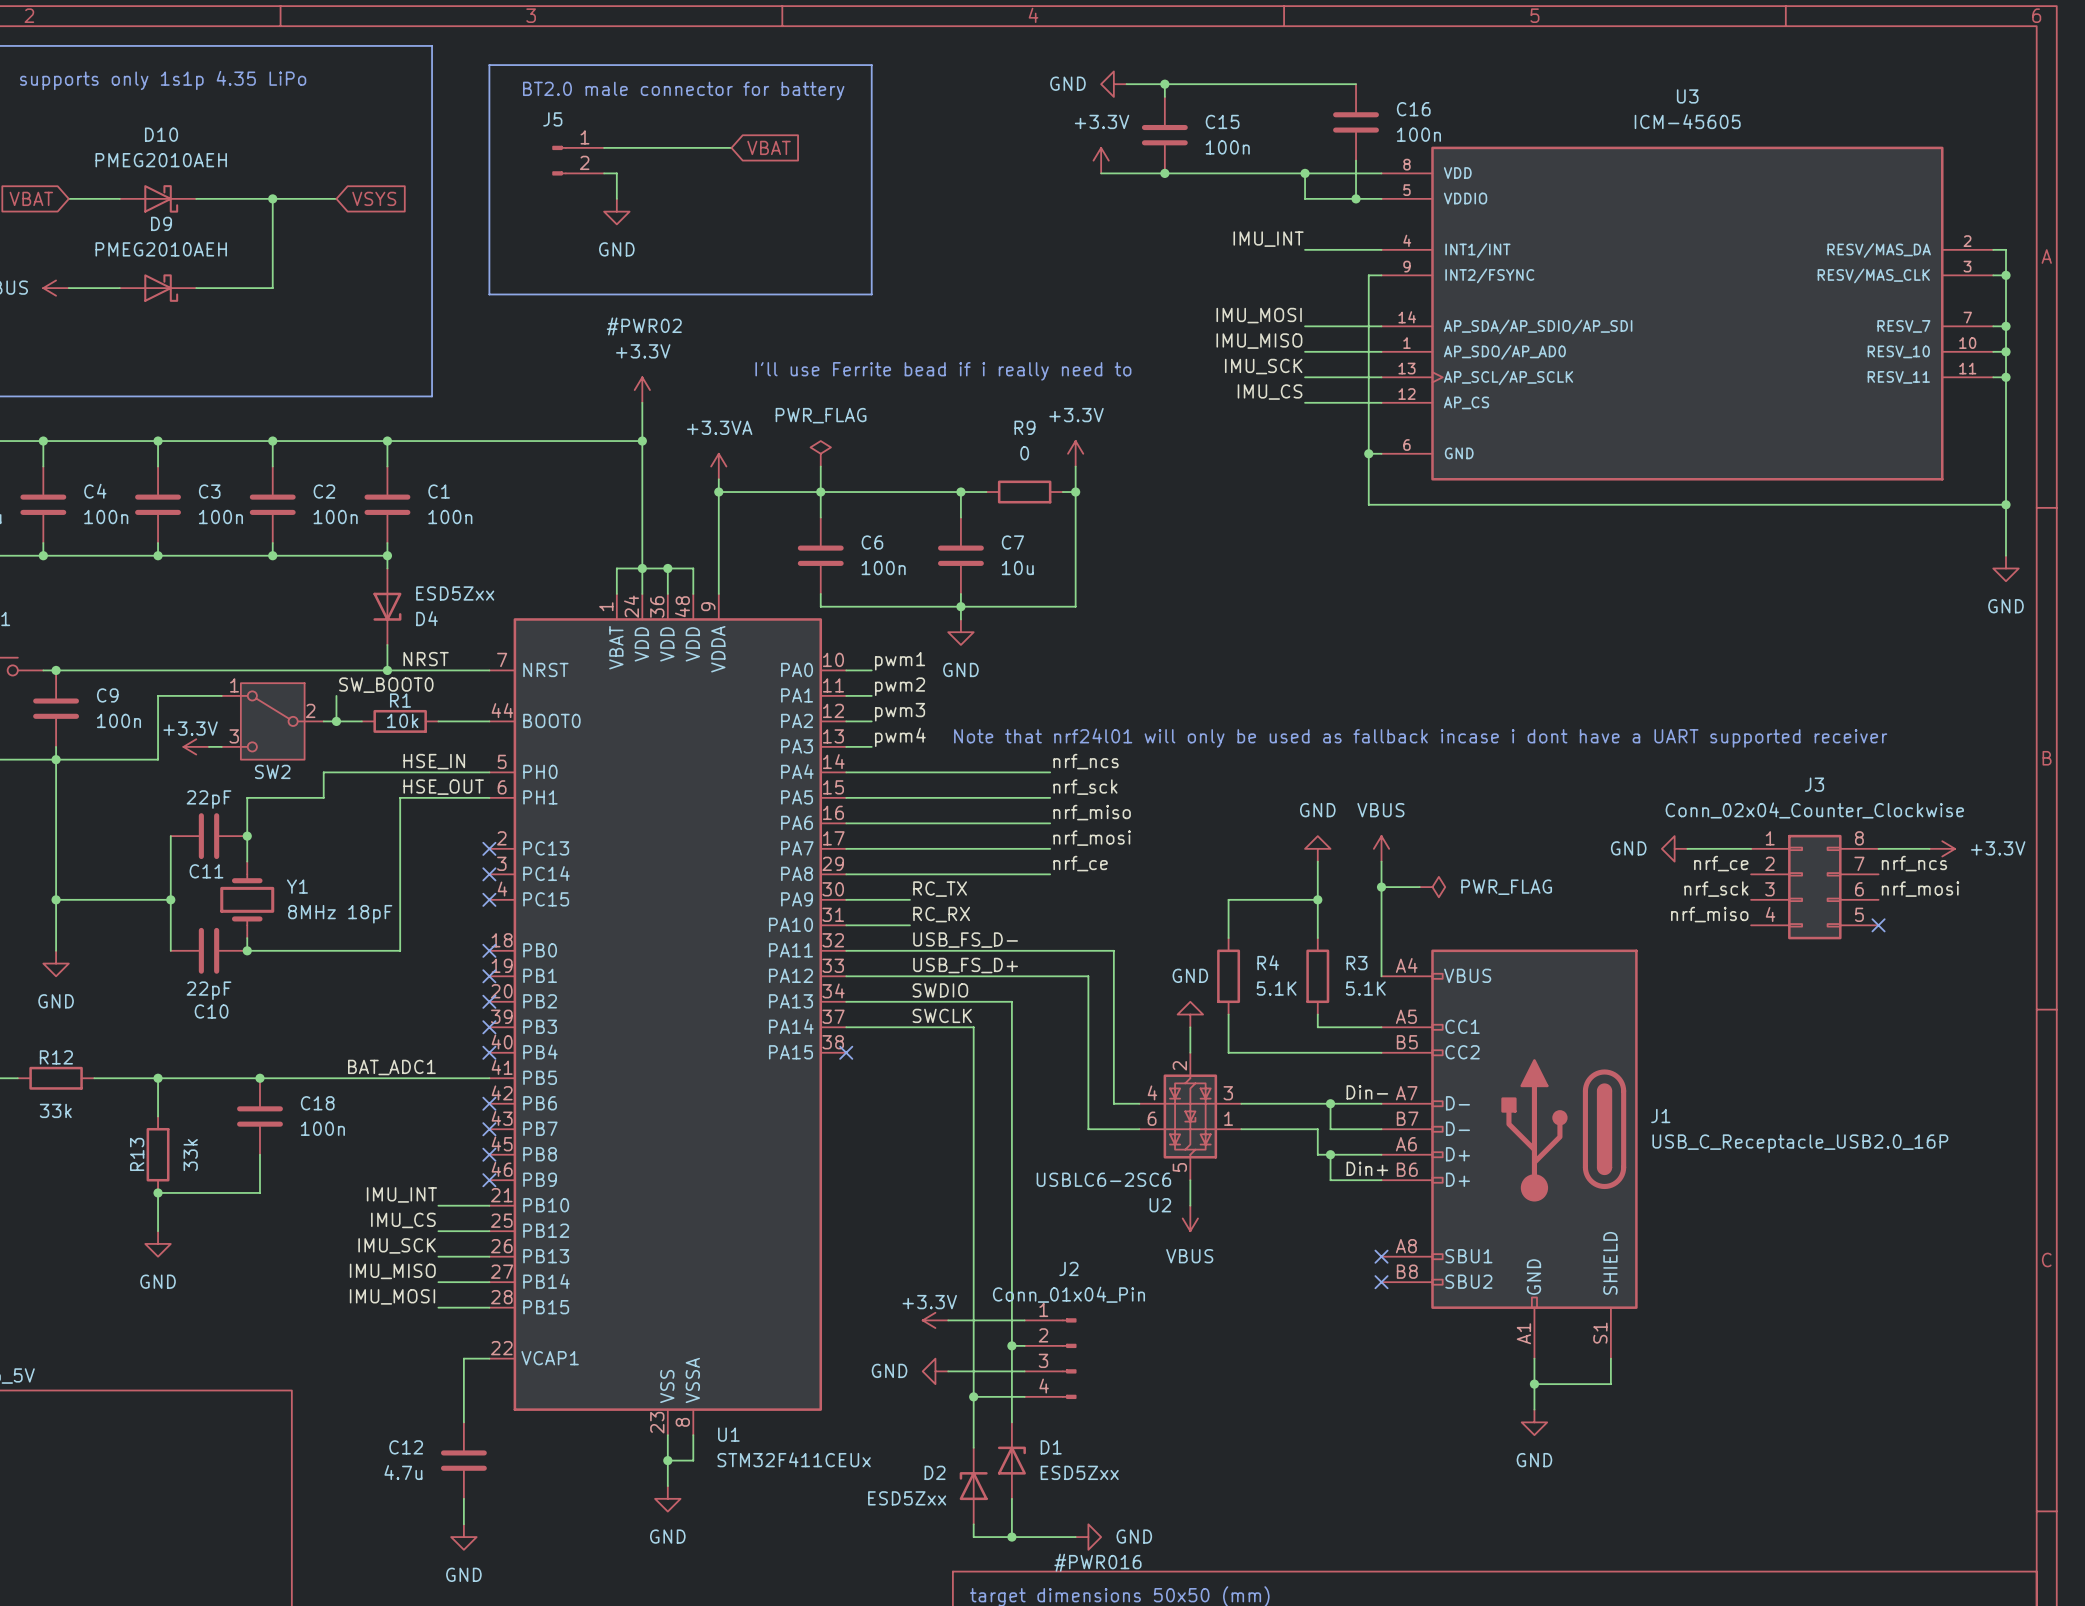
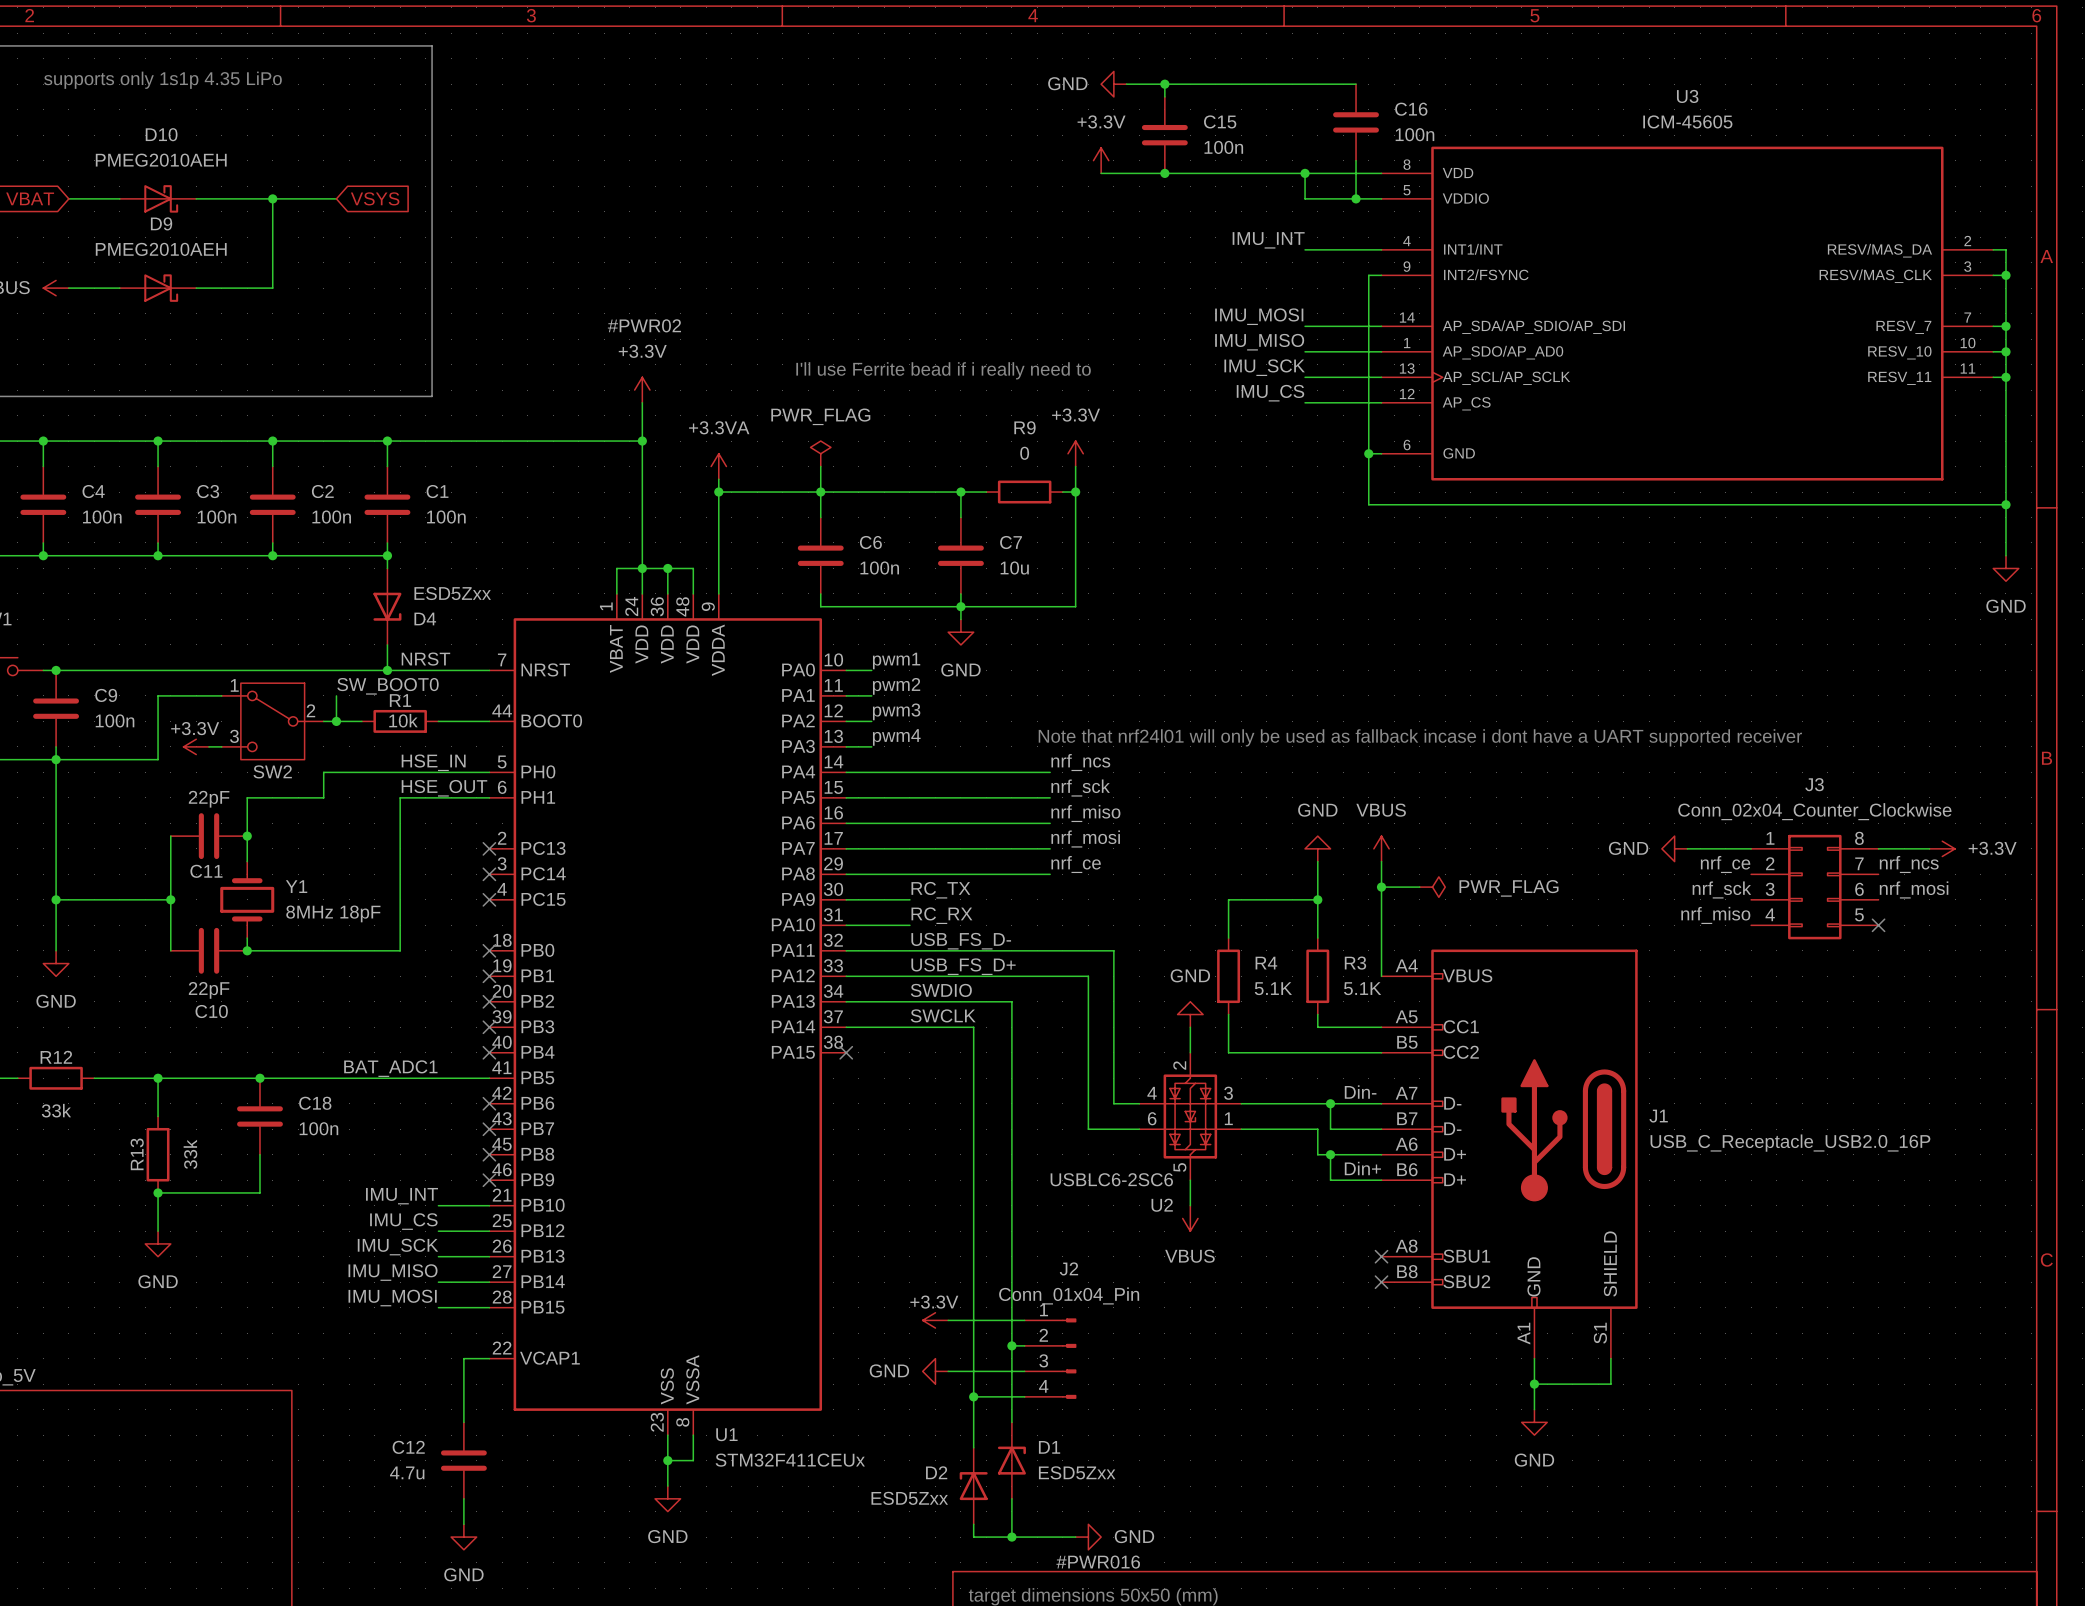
line: (489, 65) (871, 65) (871, 294) (489, 294) (489, 65) -> none
text: BT2.0 male connector for battery (683, 90) -> none
wire: (604, 147) (731, 147) -> none
global label: VBAT (769, 147) -> none
J5: (578, 160) -> none
wire: (604, 173) (616, 173) (616, 198) -> none
power symbol: GND (616, 211) -> none

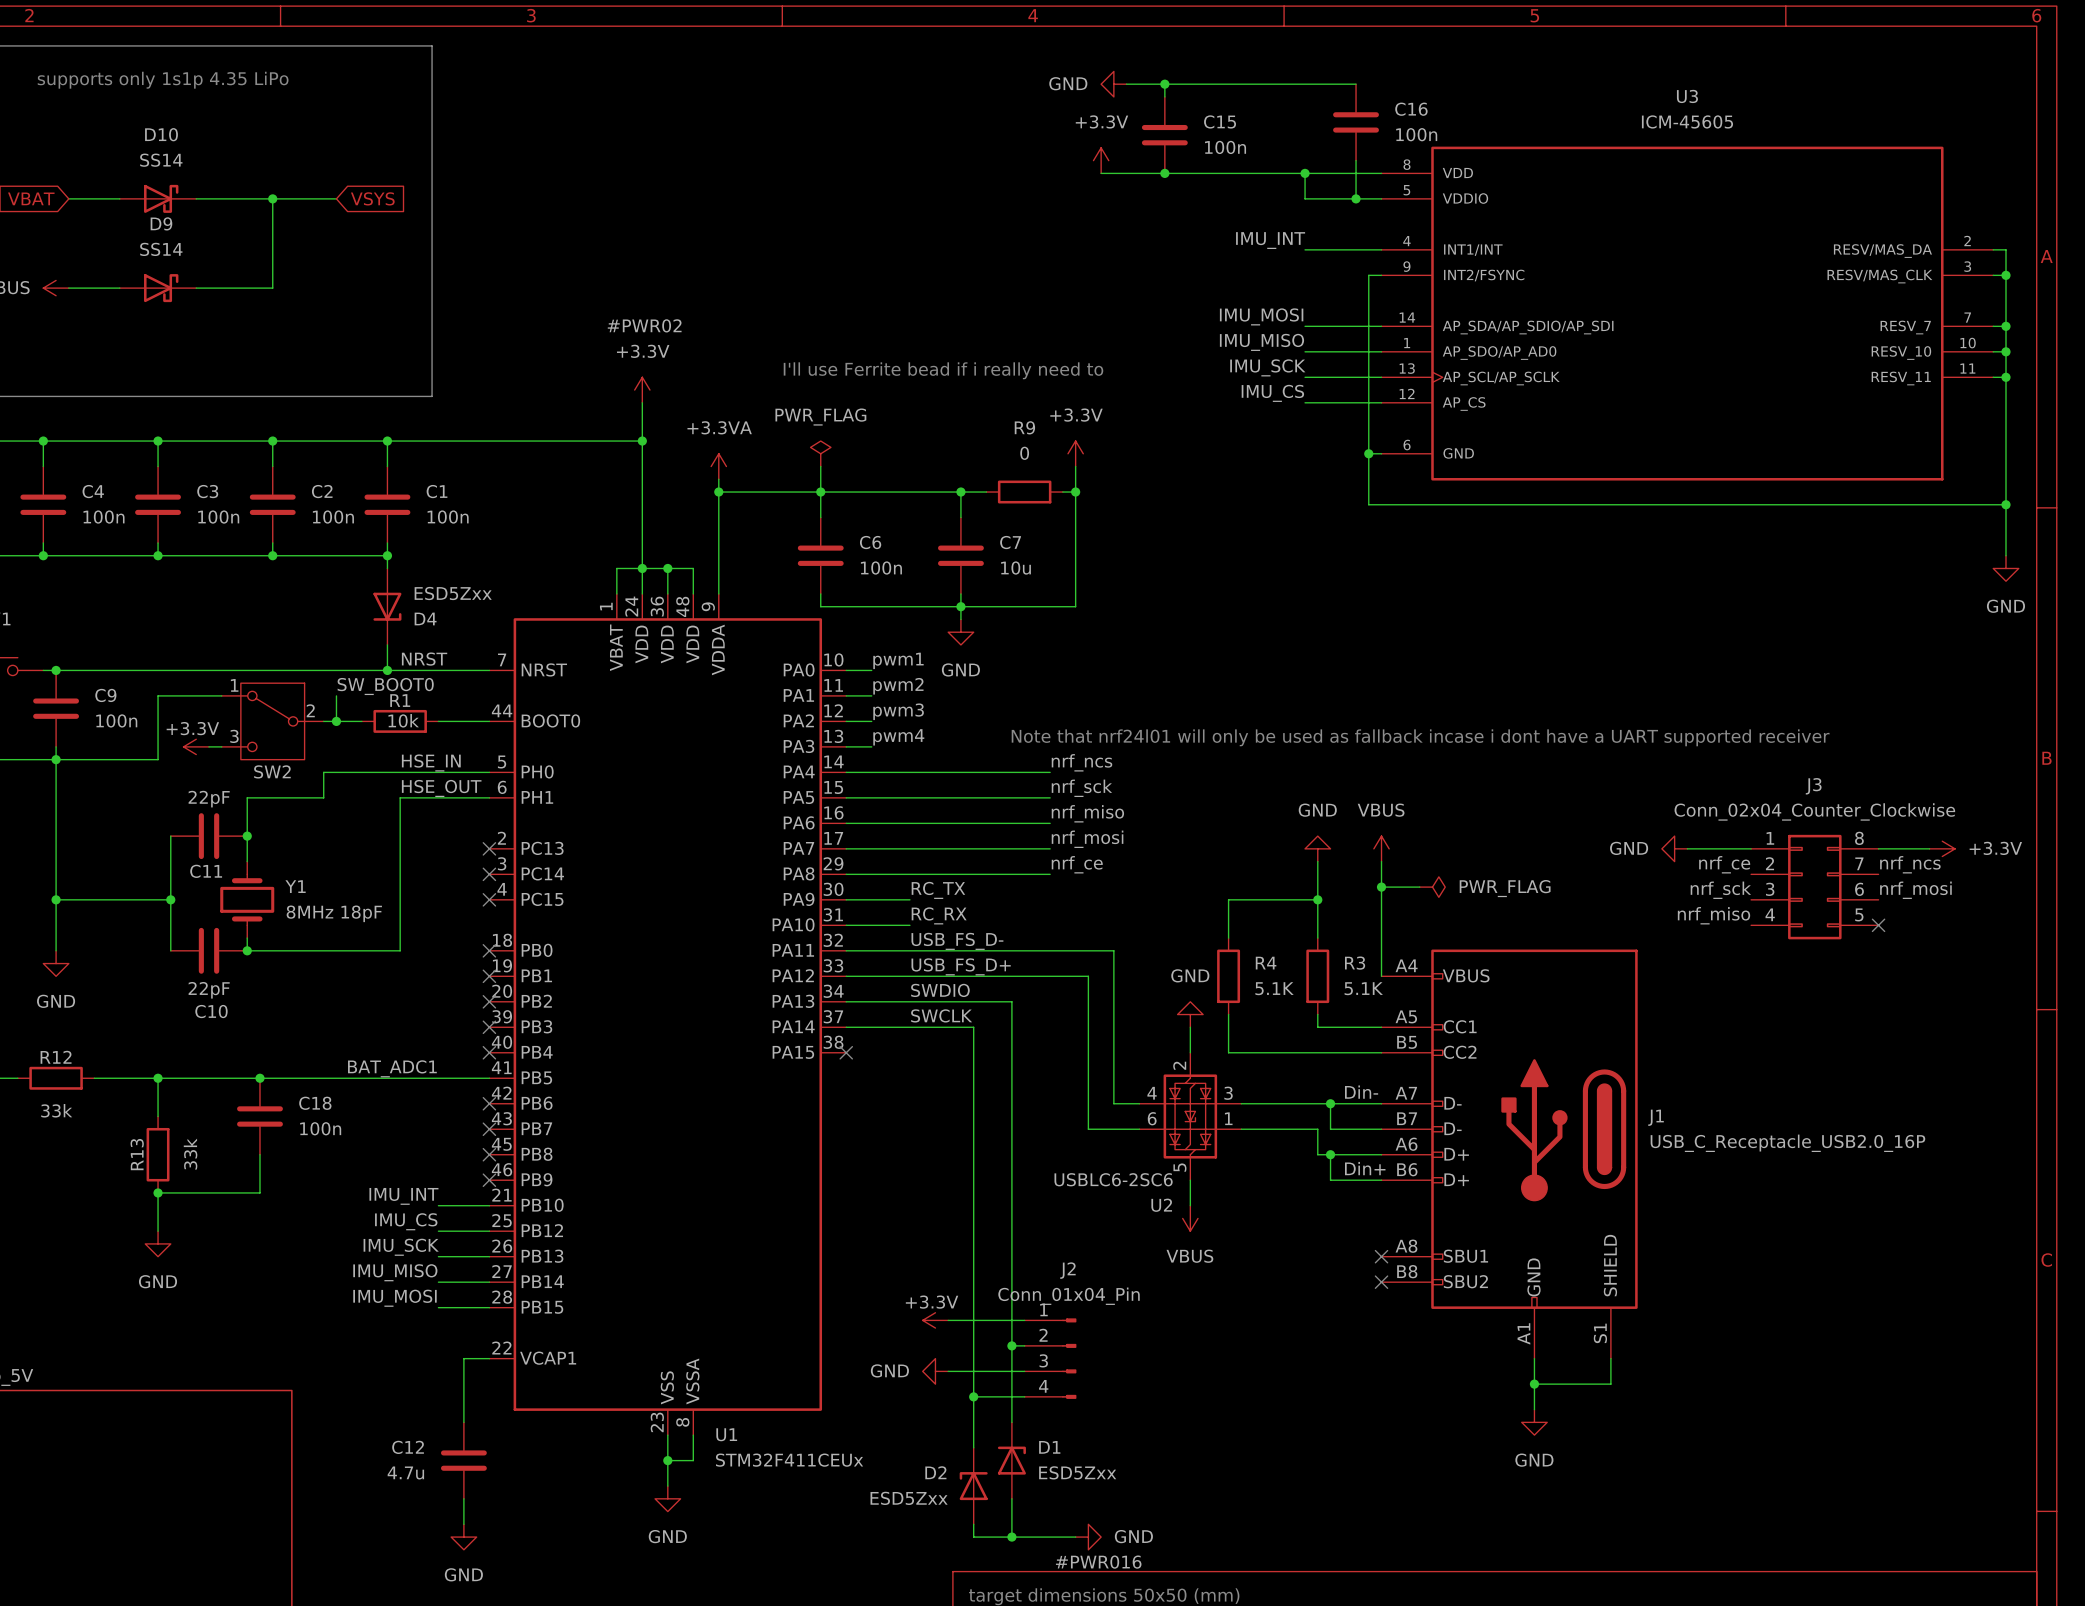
D10 value: PMEG2010AEH (161, 160) -> SS14 (161, 160)
D10 symbol: [119, 185, 197, 213] -> [119, 184, 197, 213]
D9 value: PMEG2010AEH (161, 249) -> SS14 (161, 249)
D9 symbol: [119, 274, 197, 302] -> [119, 274, 197, 303]

